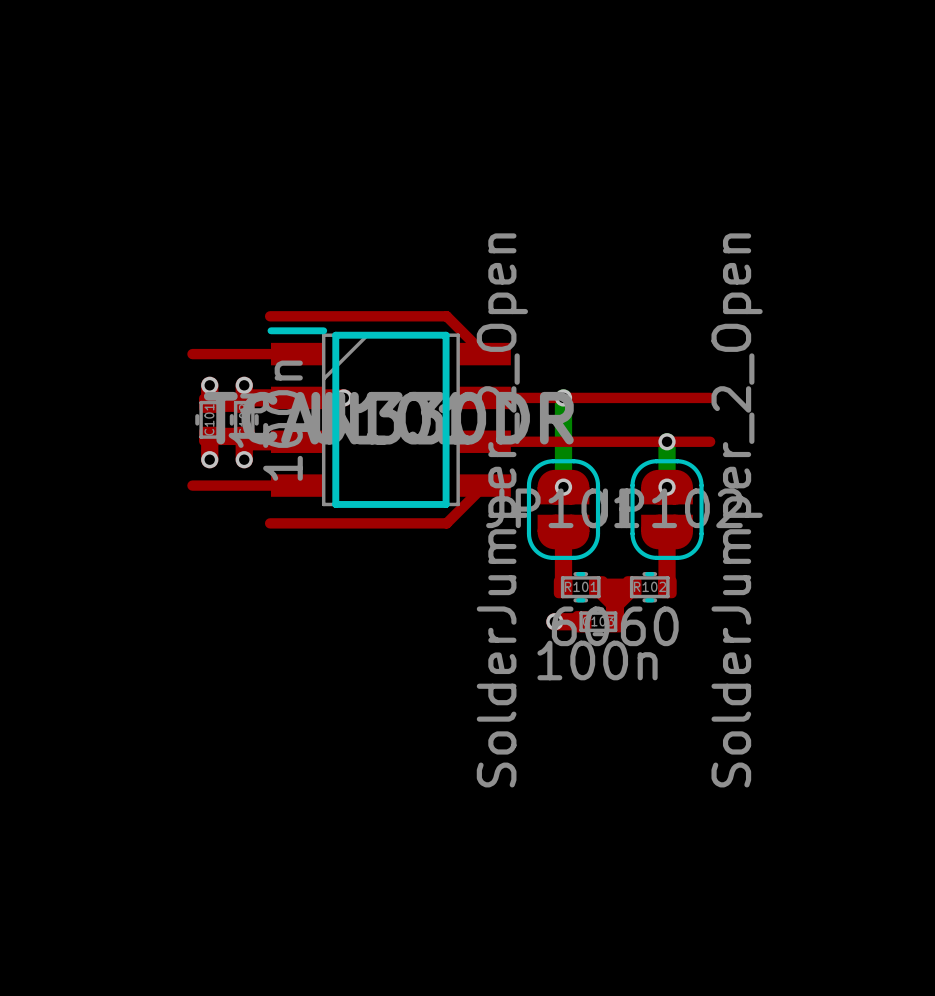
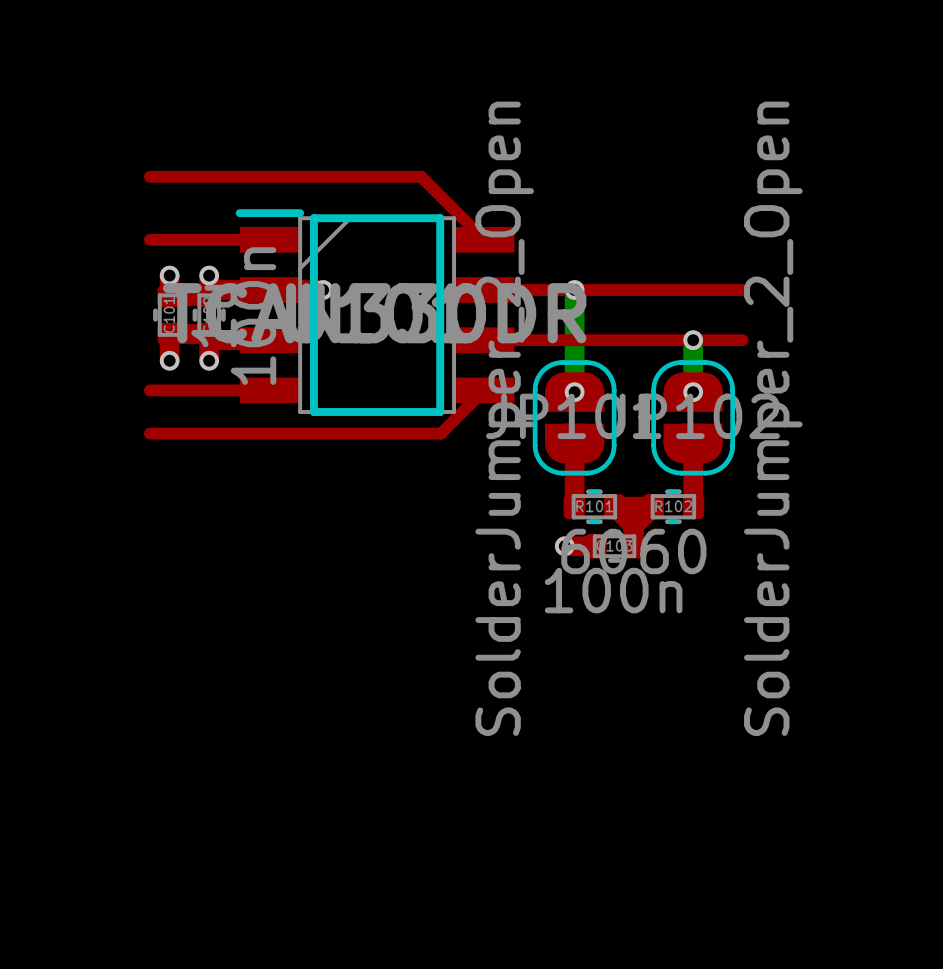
top track: (270, 316) (446, 316) -> (149, 176) (421, 176) (440, 196)
top track: none -> (149, 433) (238, 433)

